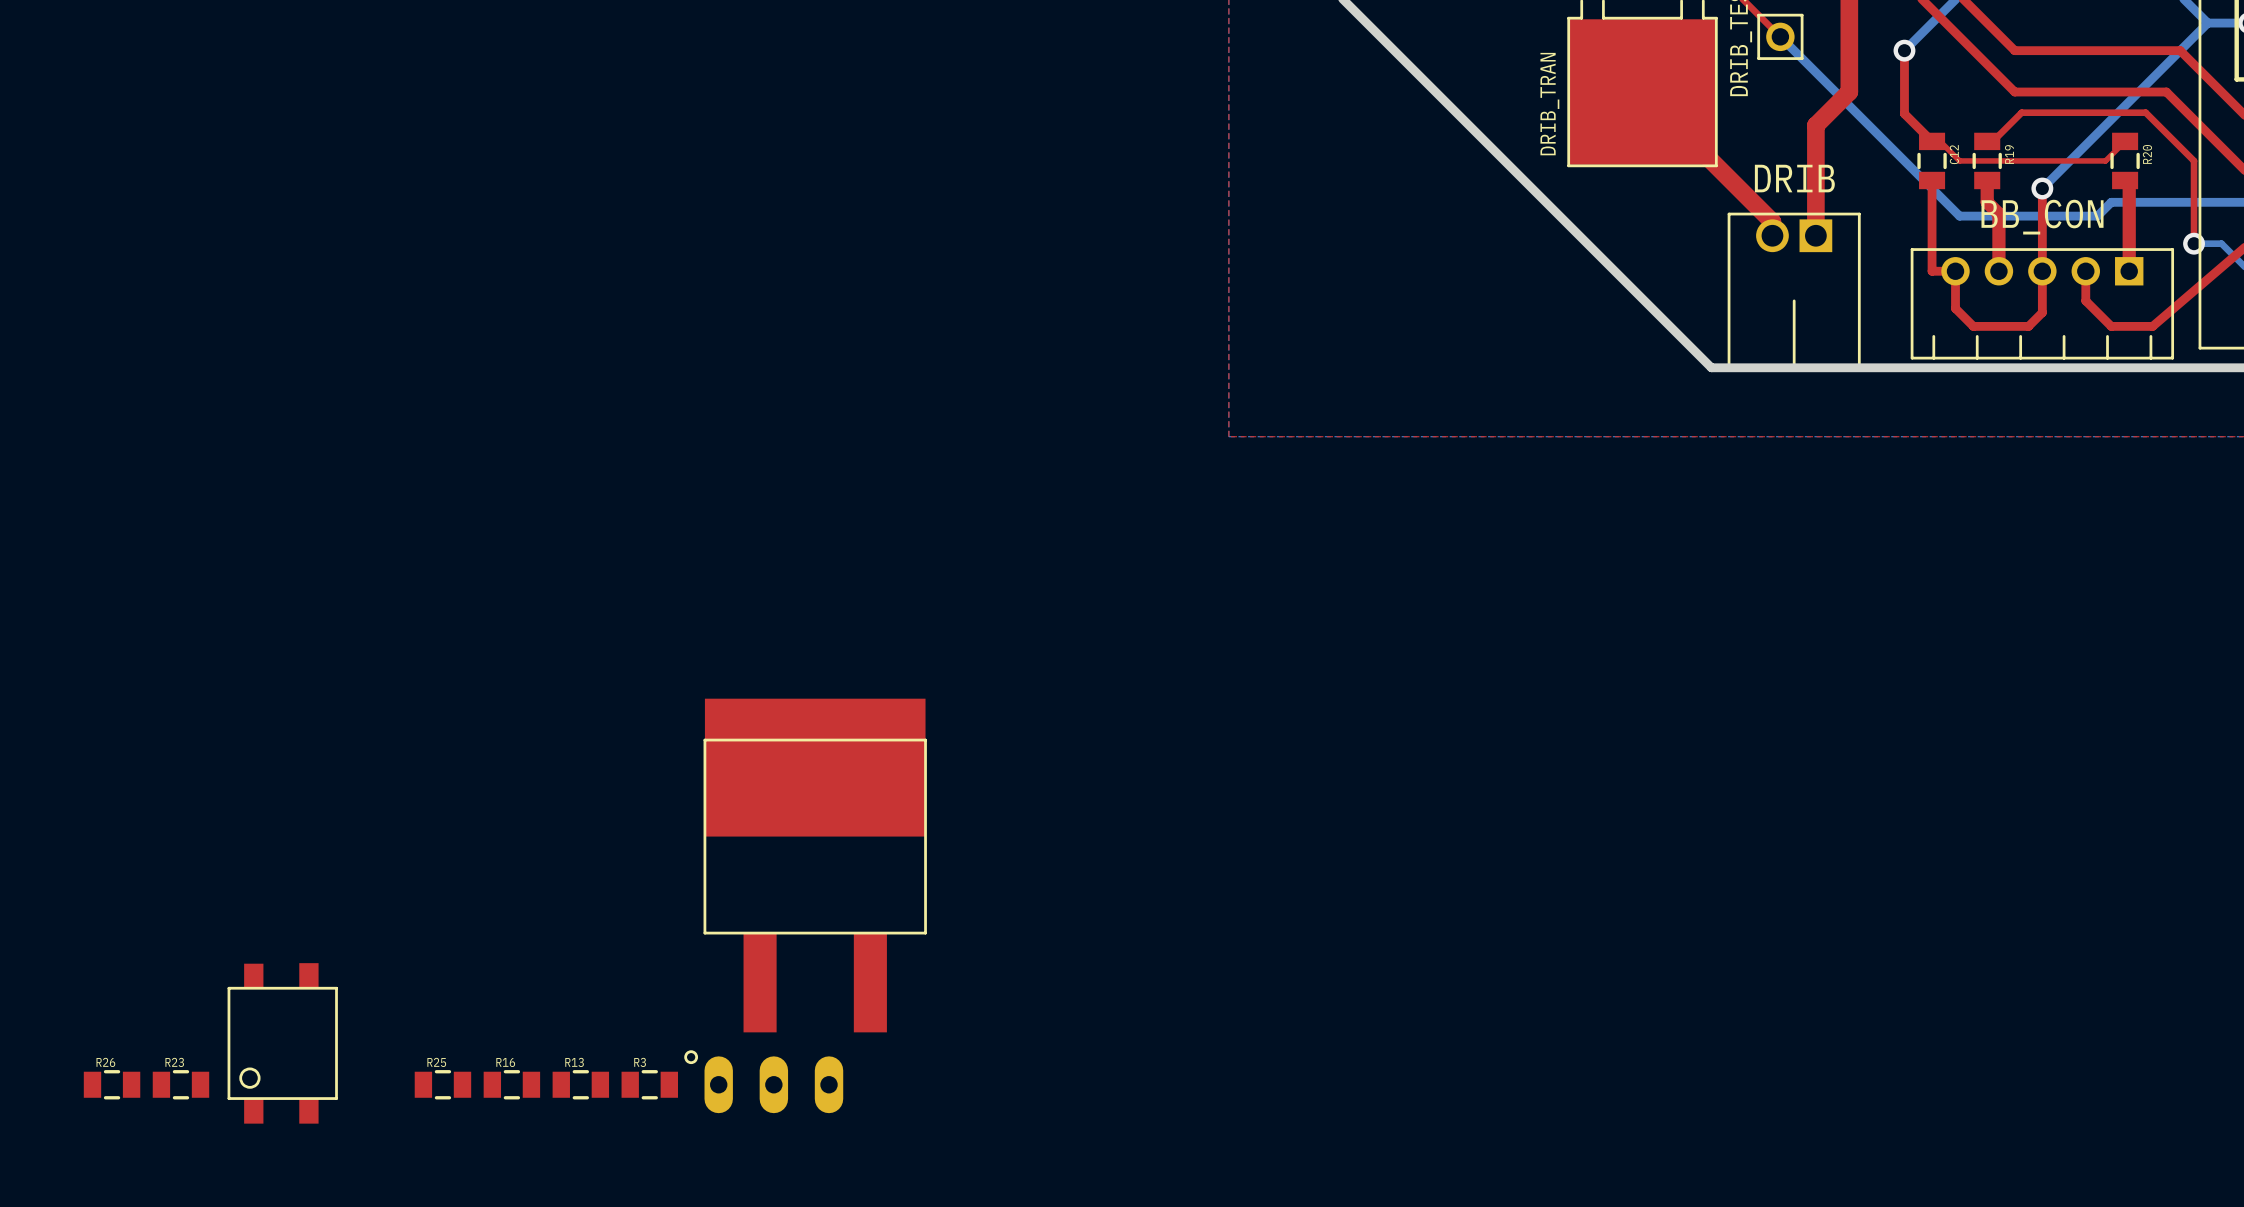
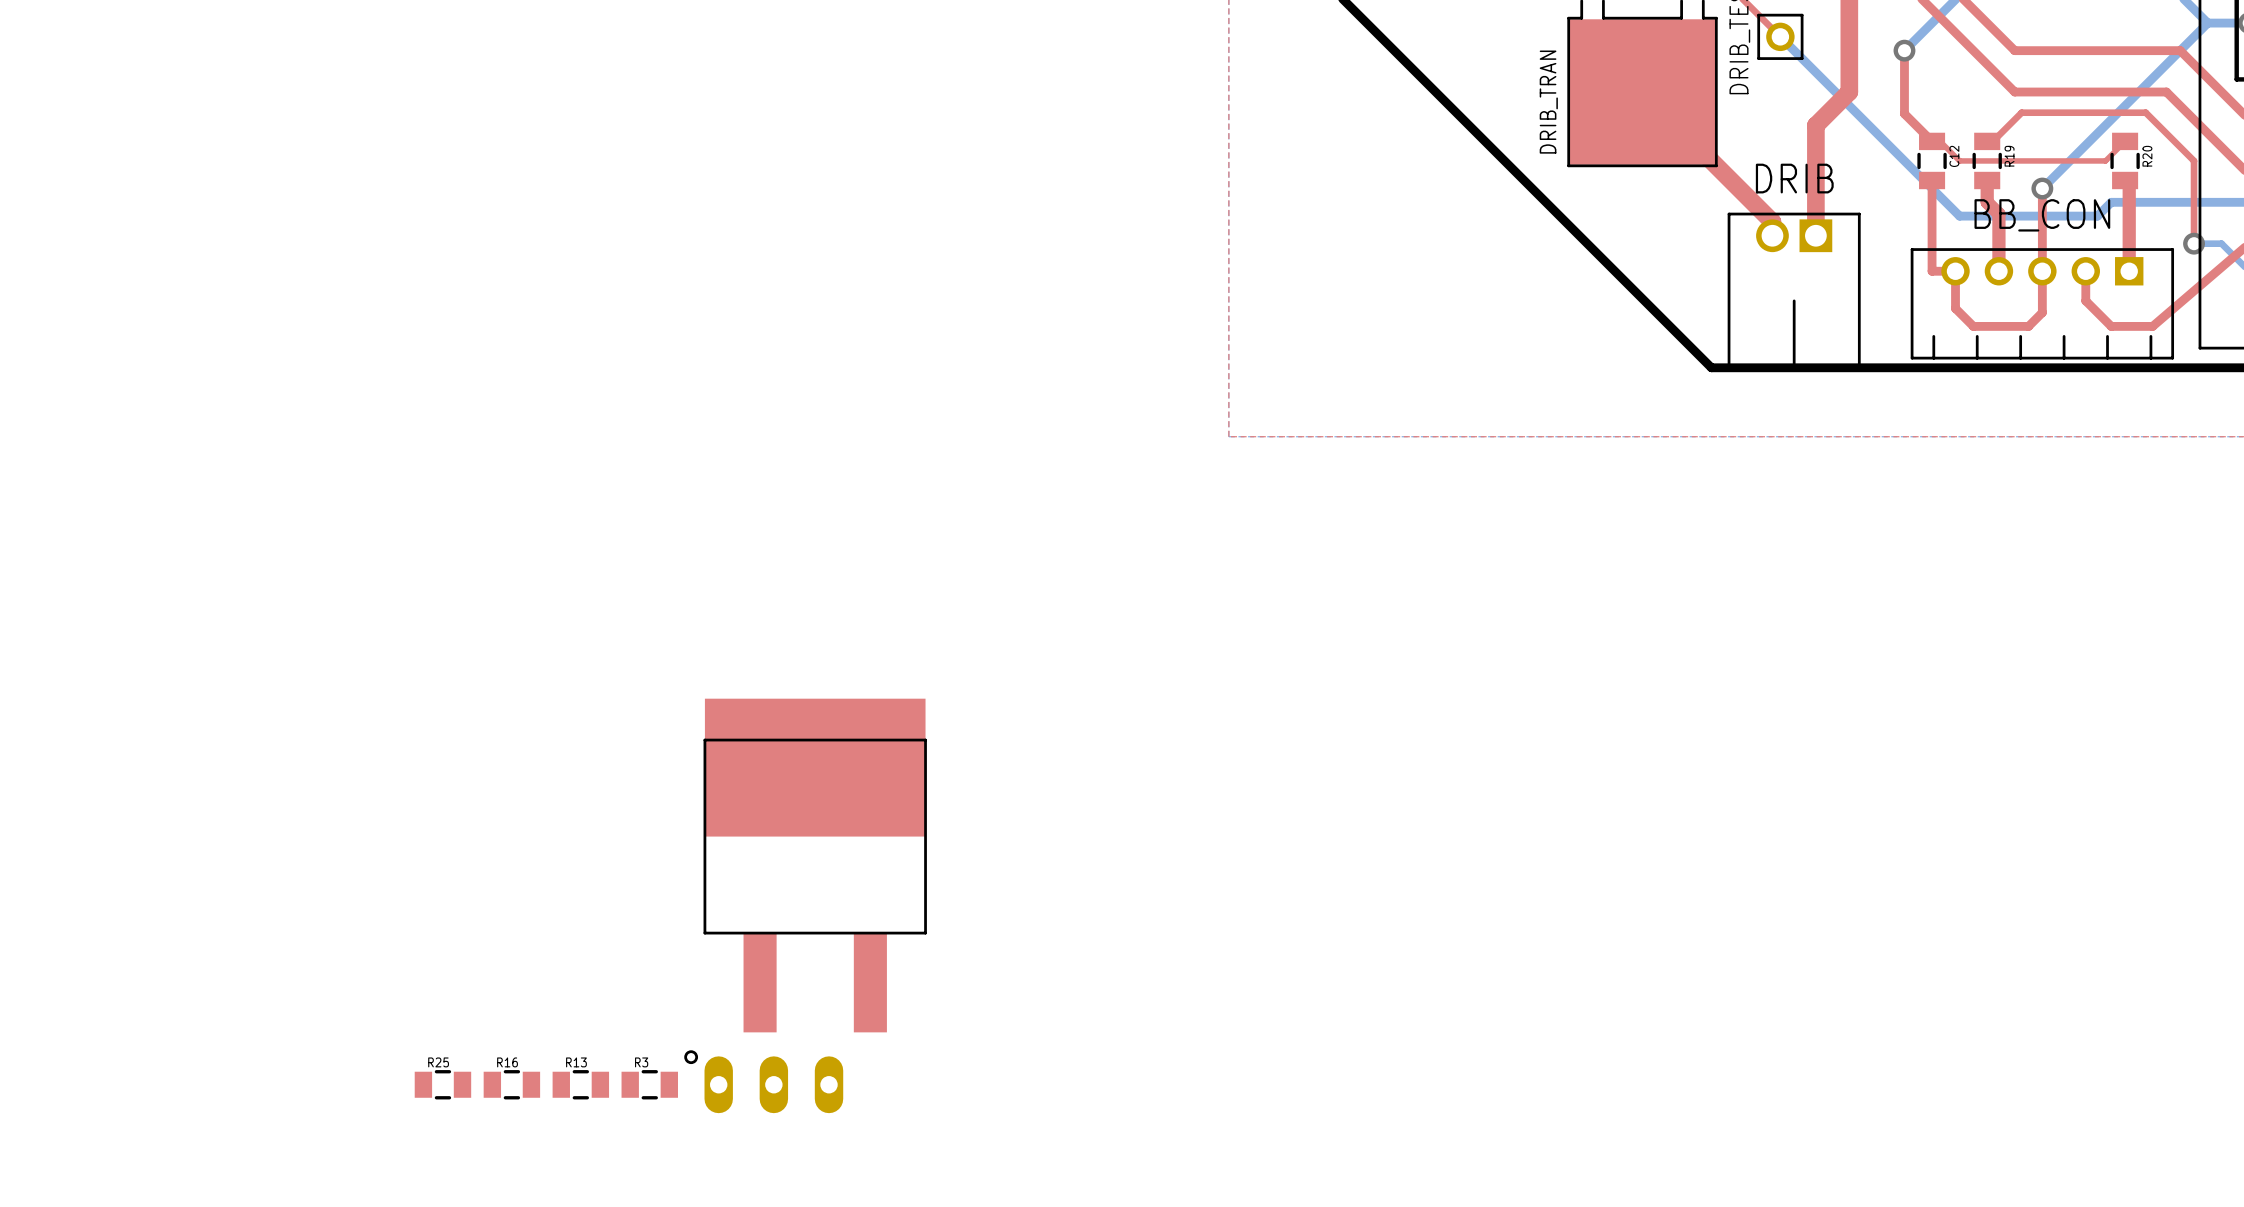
part: (282, 1043) -> none
R26: (112, 1084) -> none
R23: (180, 1084) -> none

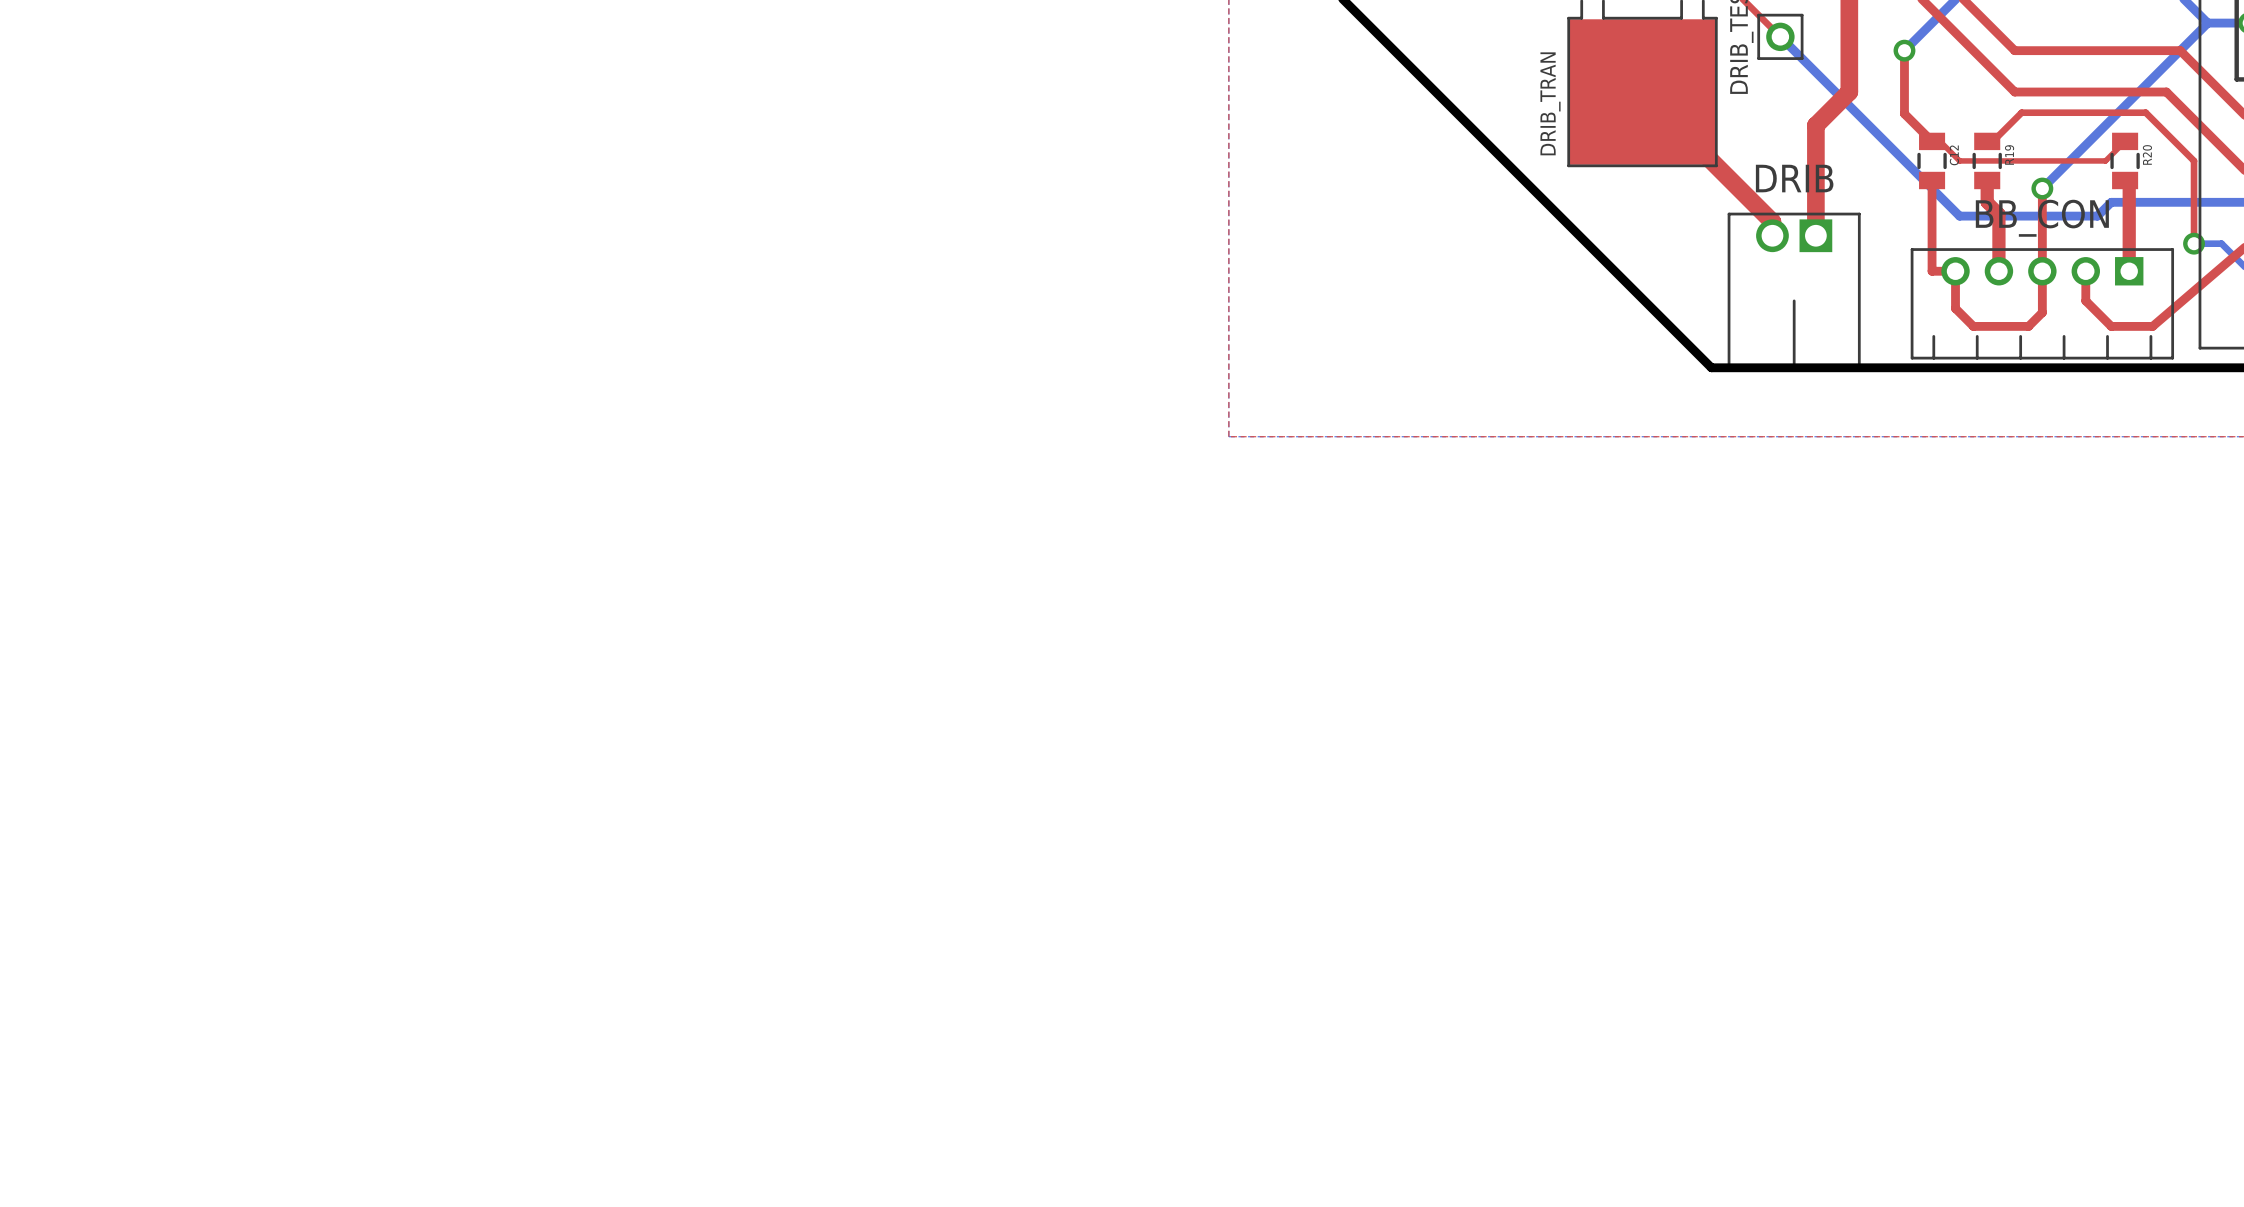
part: (815, 865) -> none
part: (763, 1081) -> none
R25: (442, 1084) -> none
R16: (511, 1084) -> none
R13: (580, 1084) -> none
R3: (649, 1084) -> none

